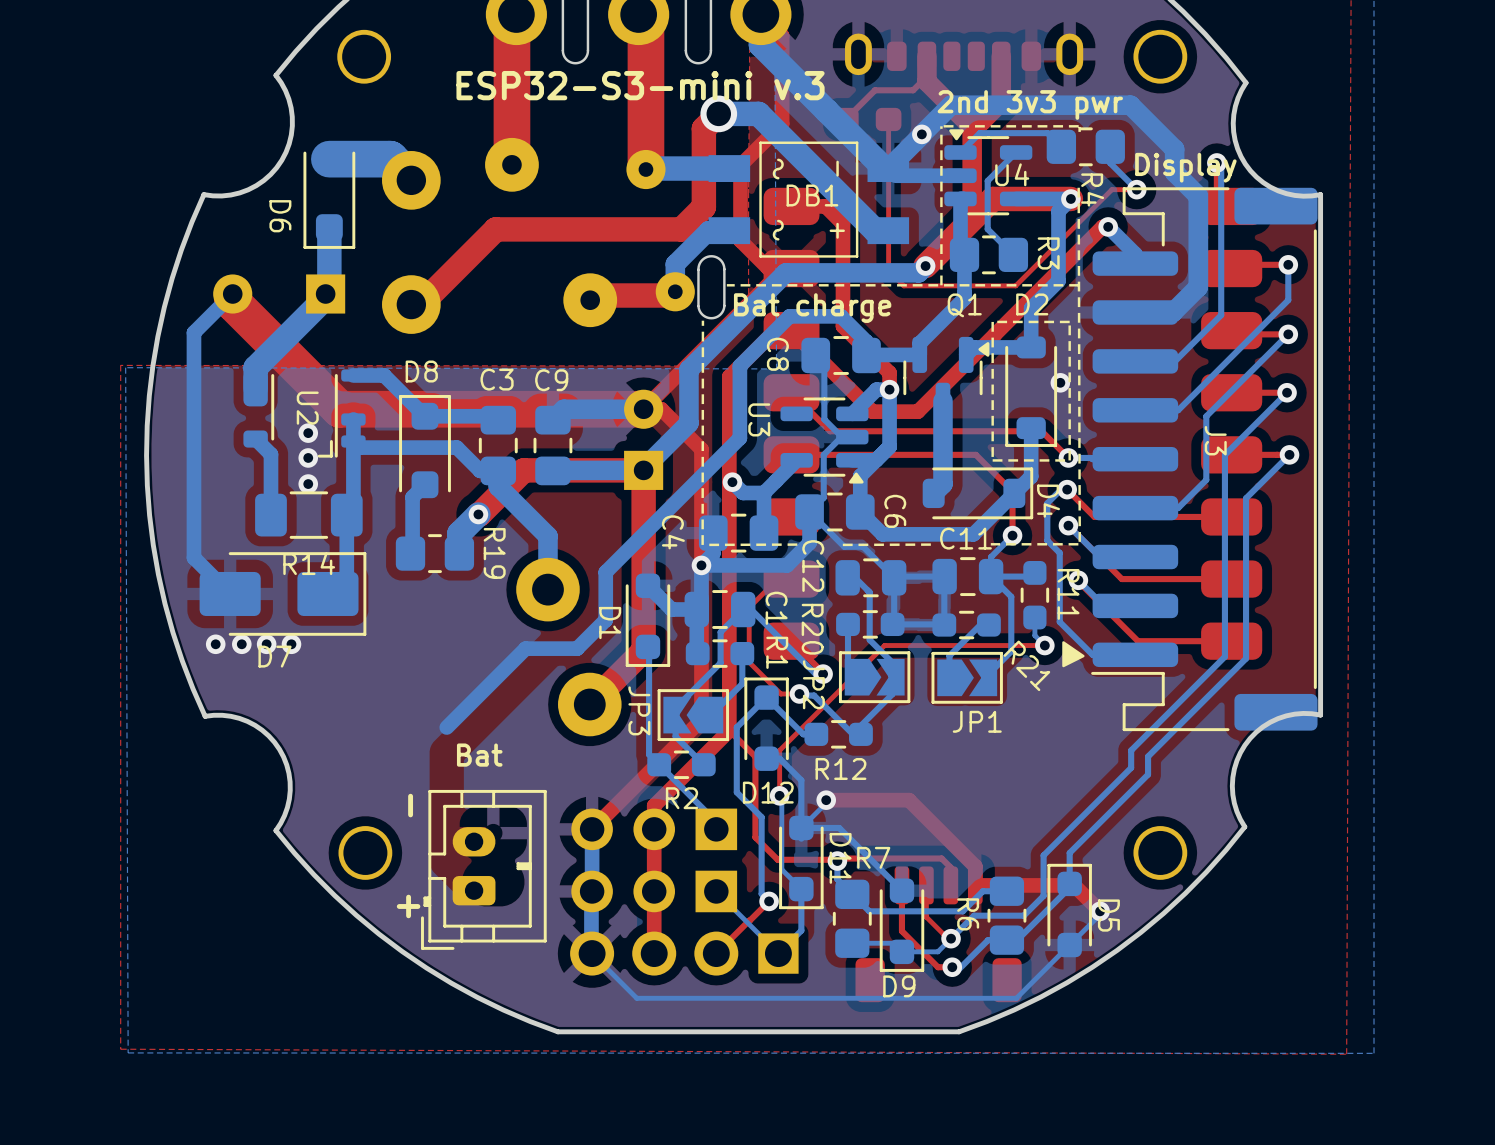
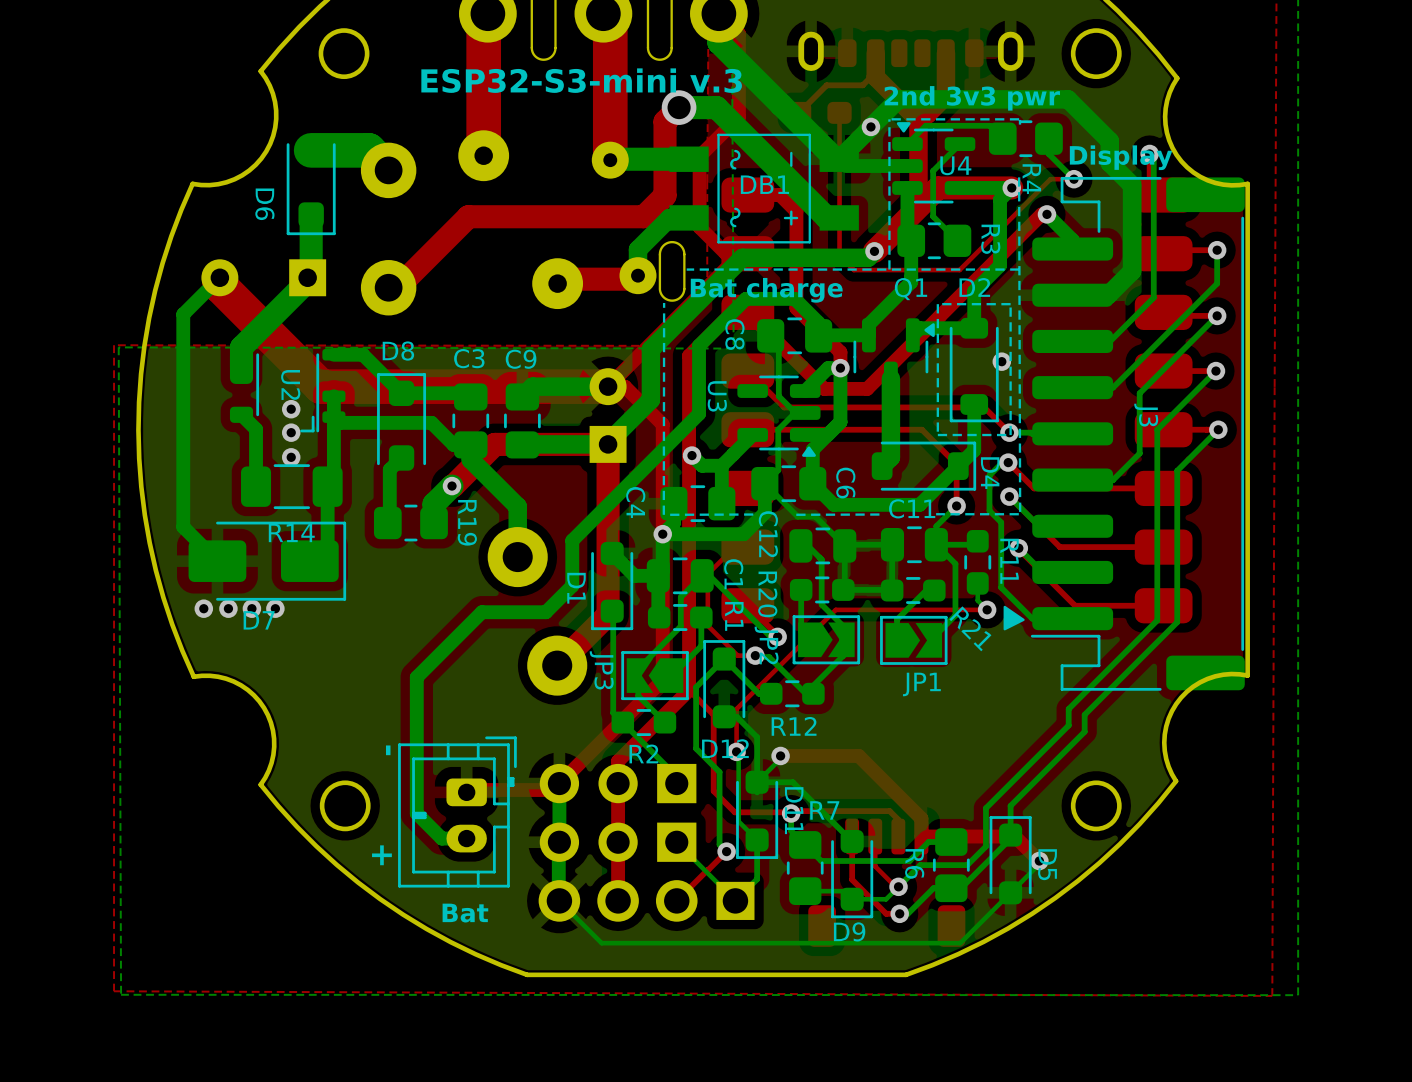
bottom track: (577, 648) (525, 648) (446, 727) -> (545, 612) (481, 612) (416, 677) (416, 813) (441, 838) (466, 838)
text position: Bat (479, 755) -> Bat (465, 913)
top track: none -> (559, 783) (552, 790) (469, 790) (466, 792)
part rotation: 0° (483, 869) -> 180° (457, 812)

